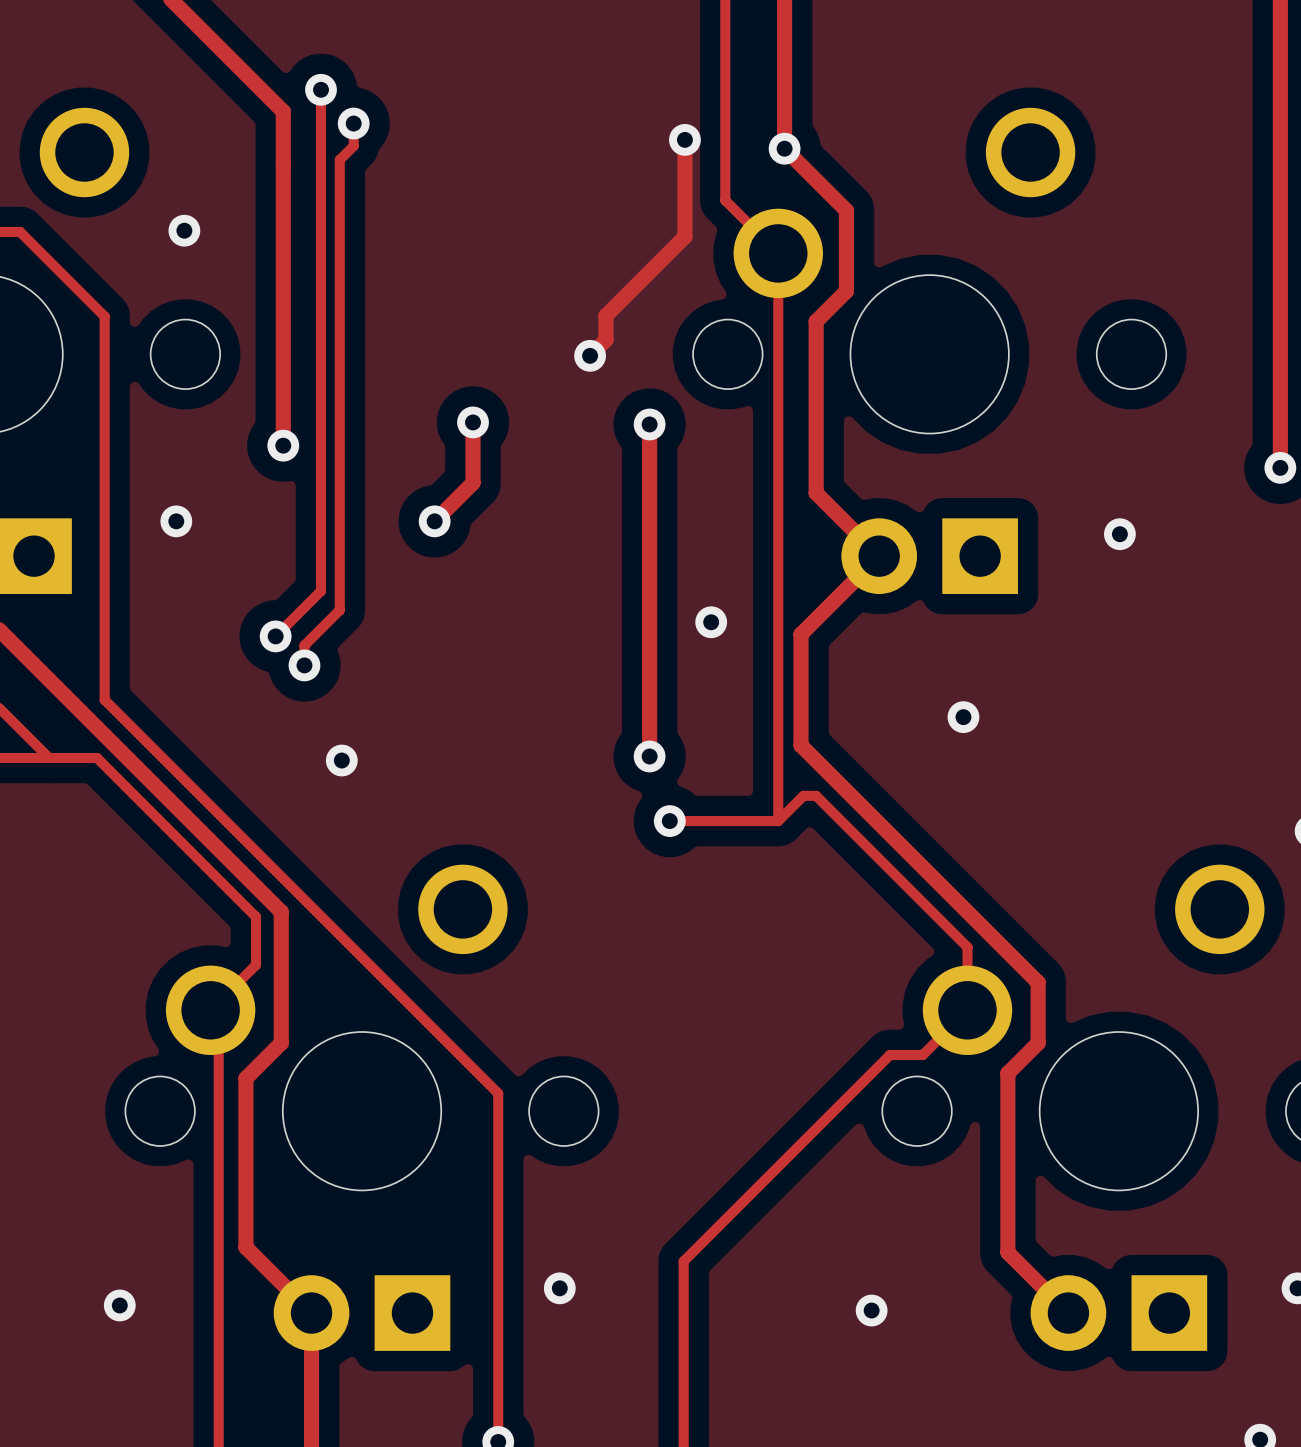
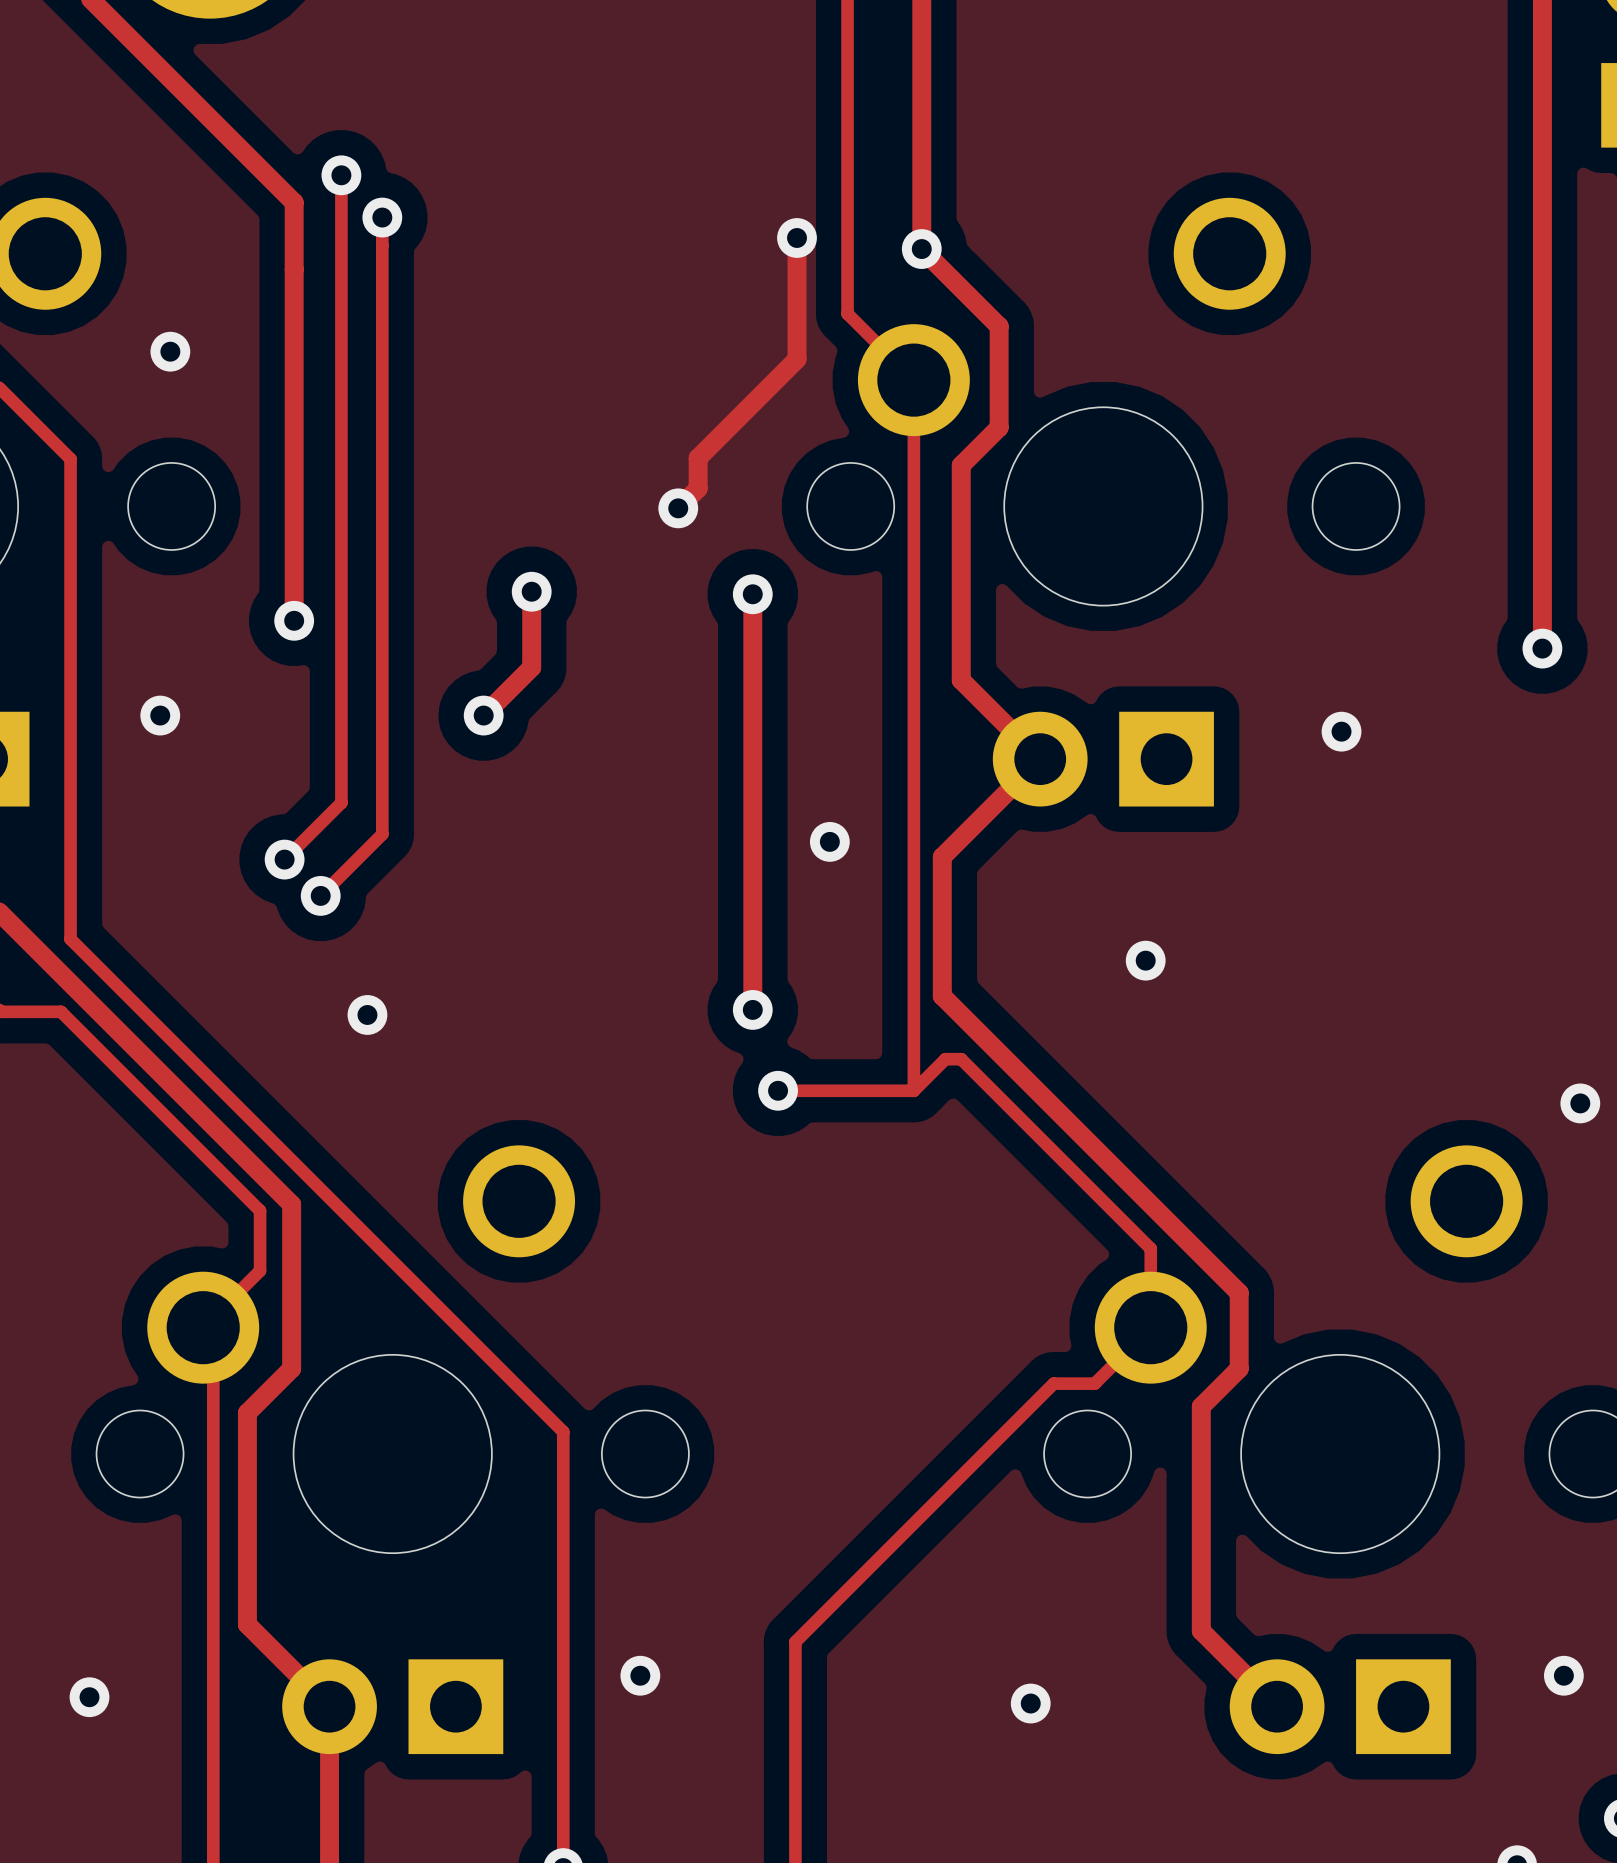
track: (353, 146) (339, 159) (339, 610) (304, 645) (304, 665) -> (382, 245) (382, 834) (320, 895)

